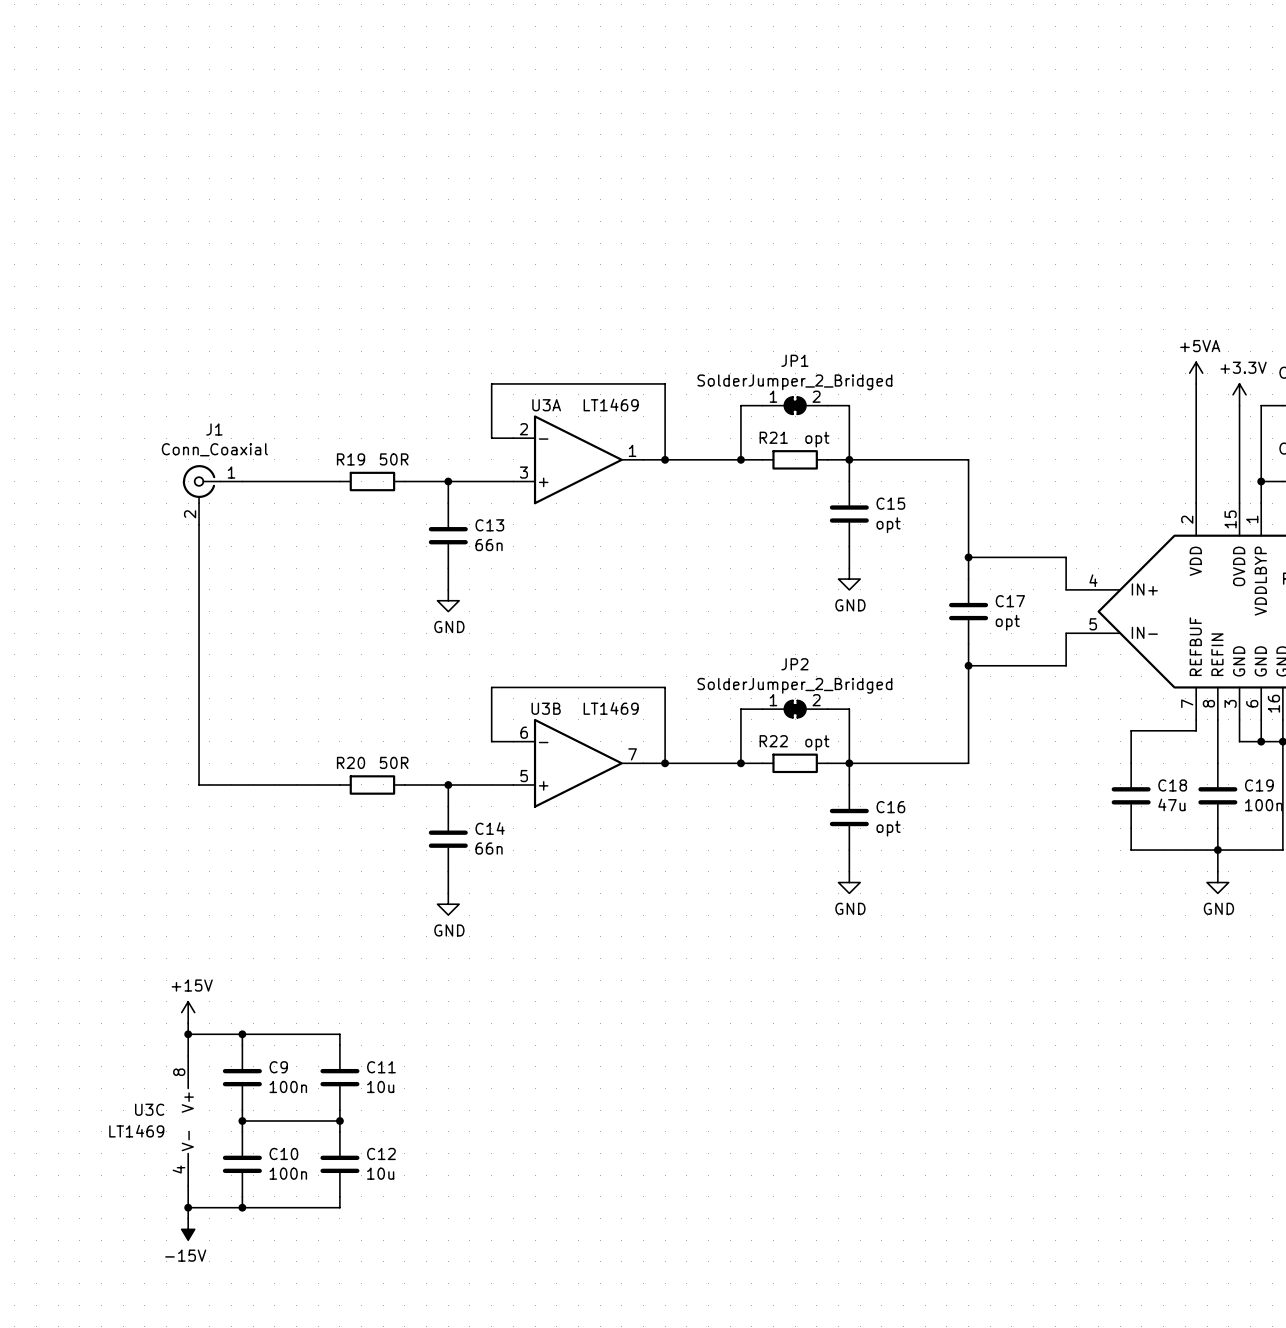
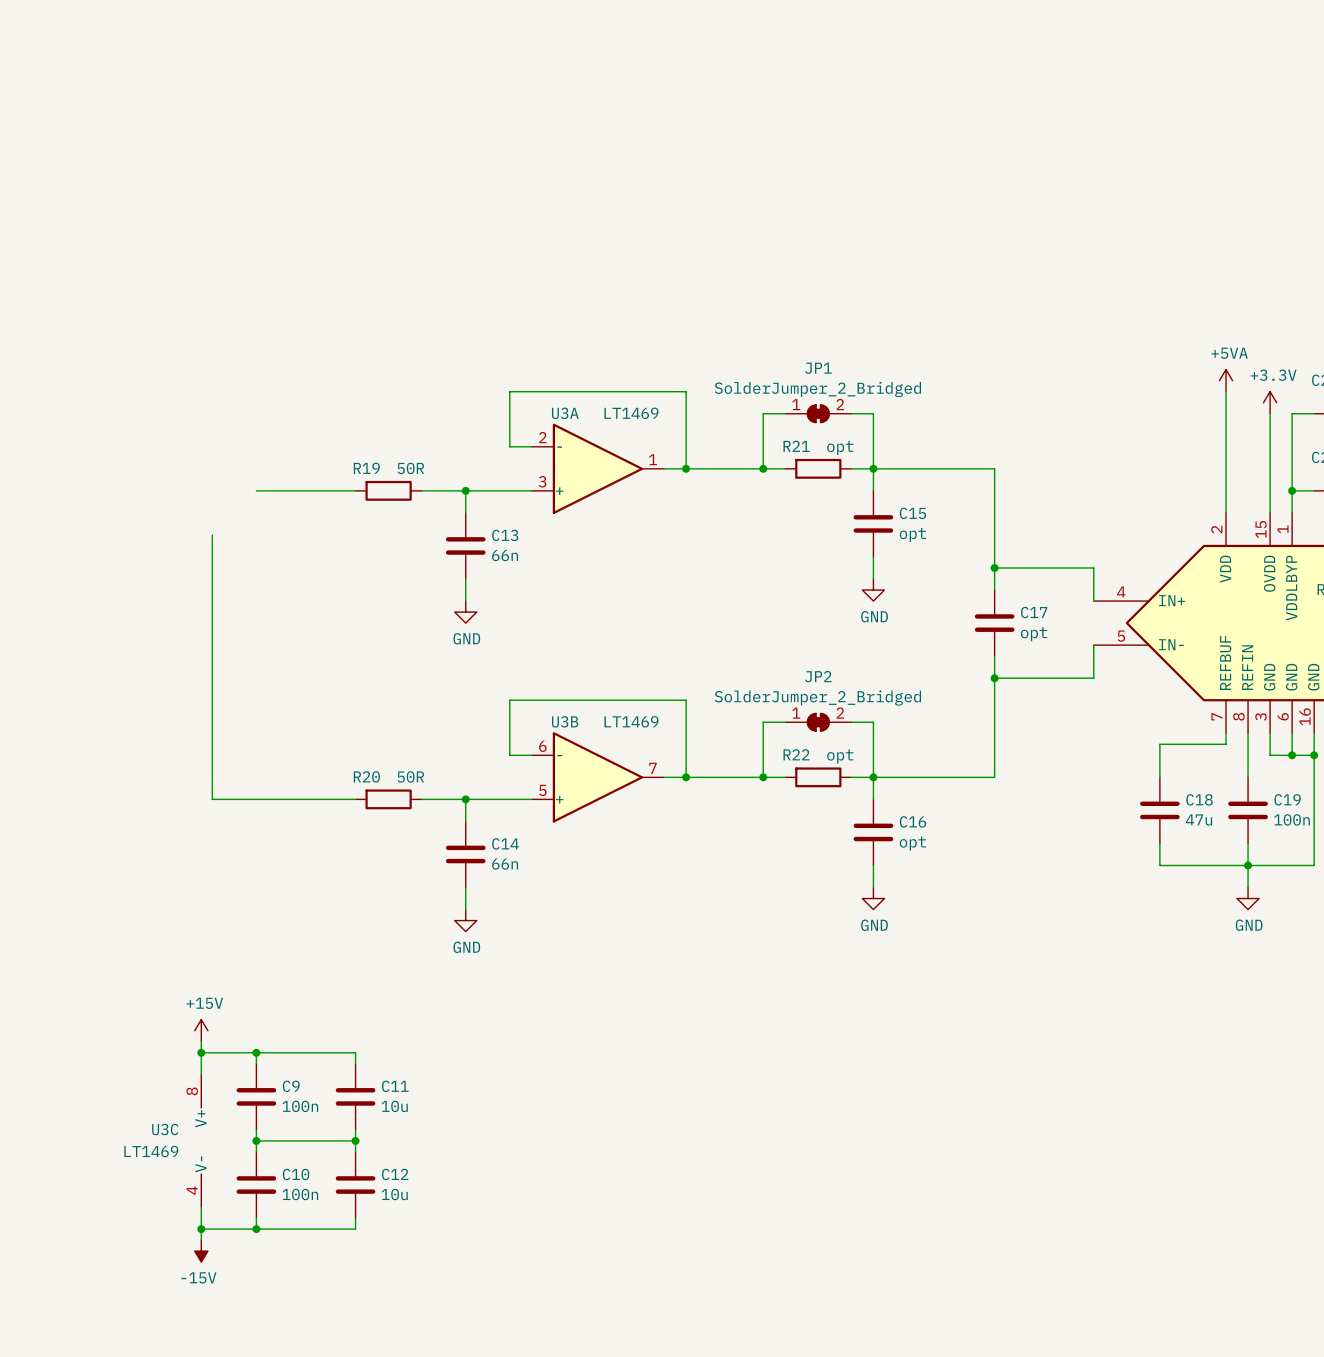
J1: Conn_Coaxial (212, 494) -> none

